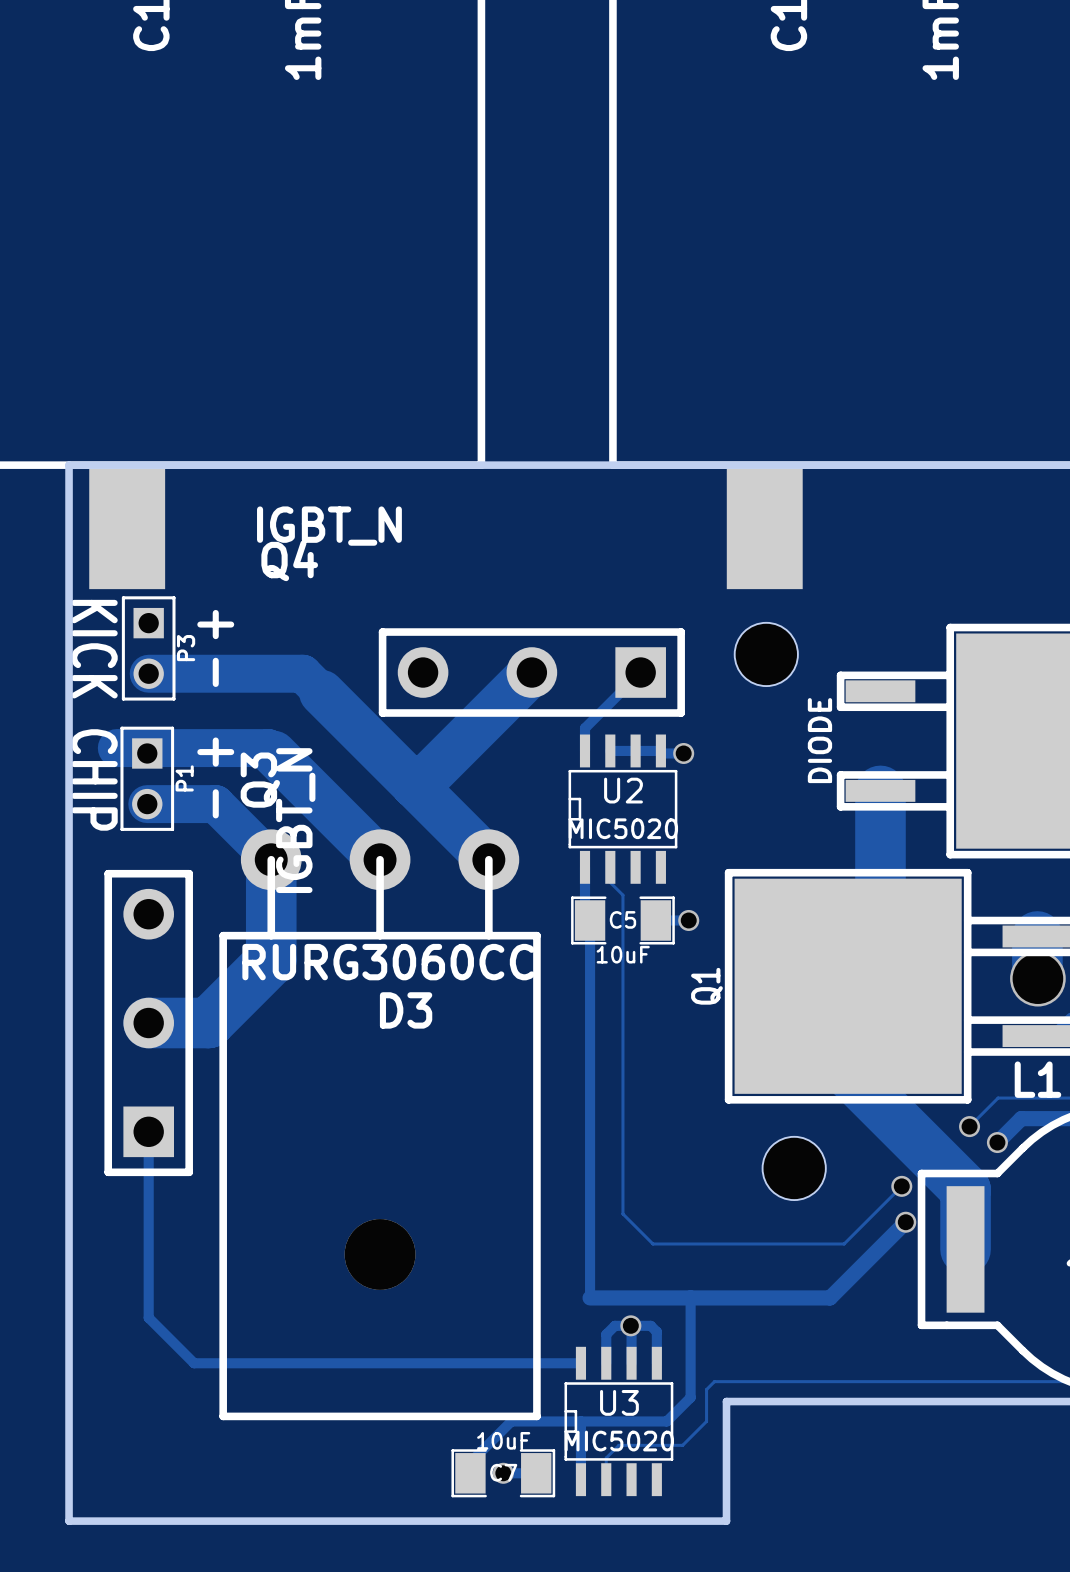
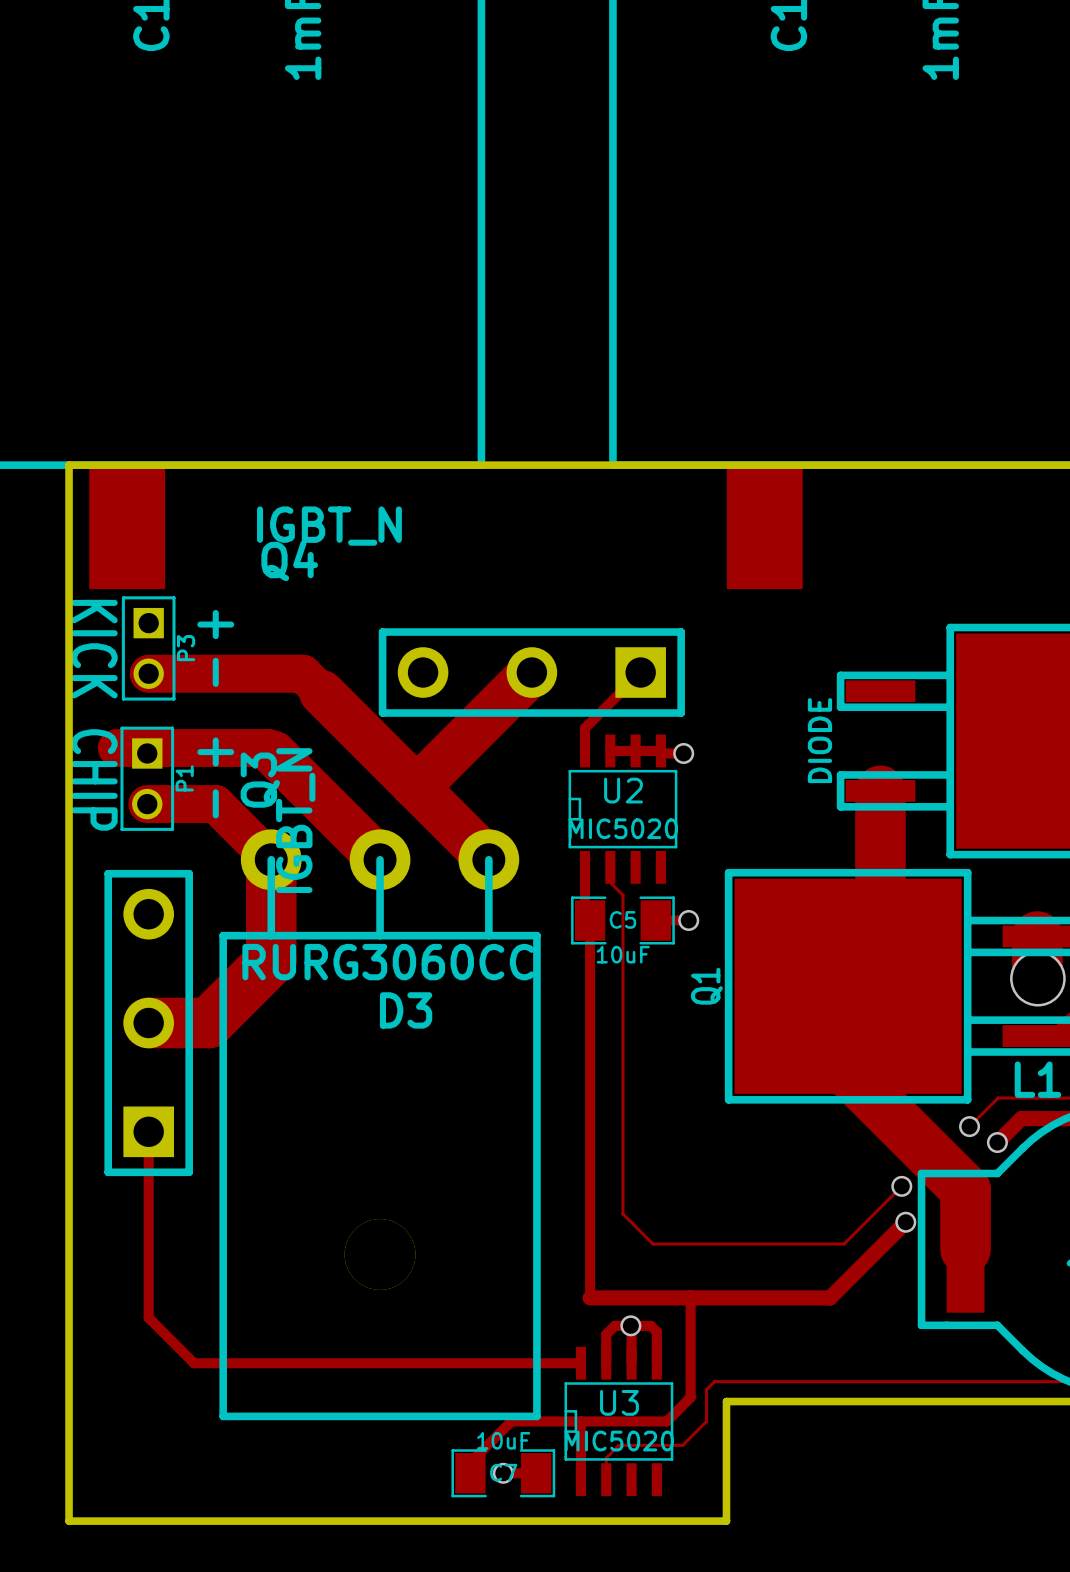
part: (766, 654) -> none
part: (794, 1168) -> none

